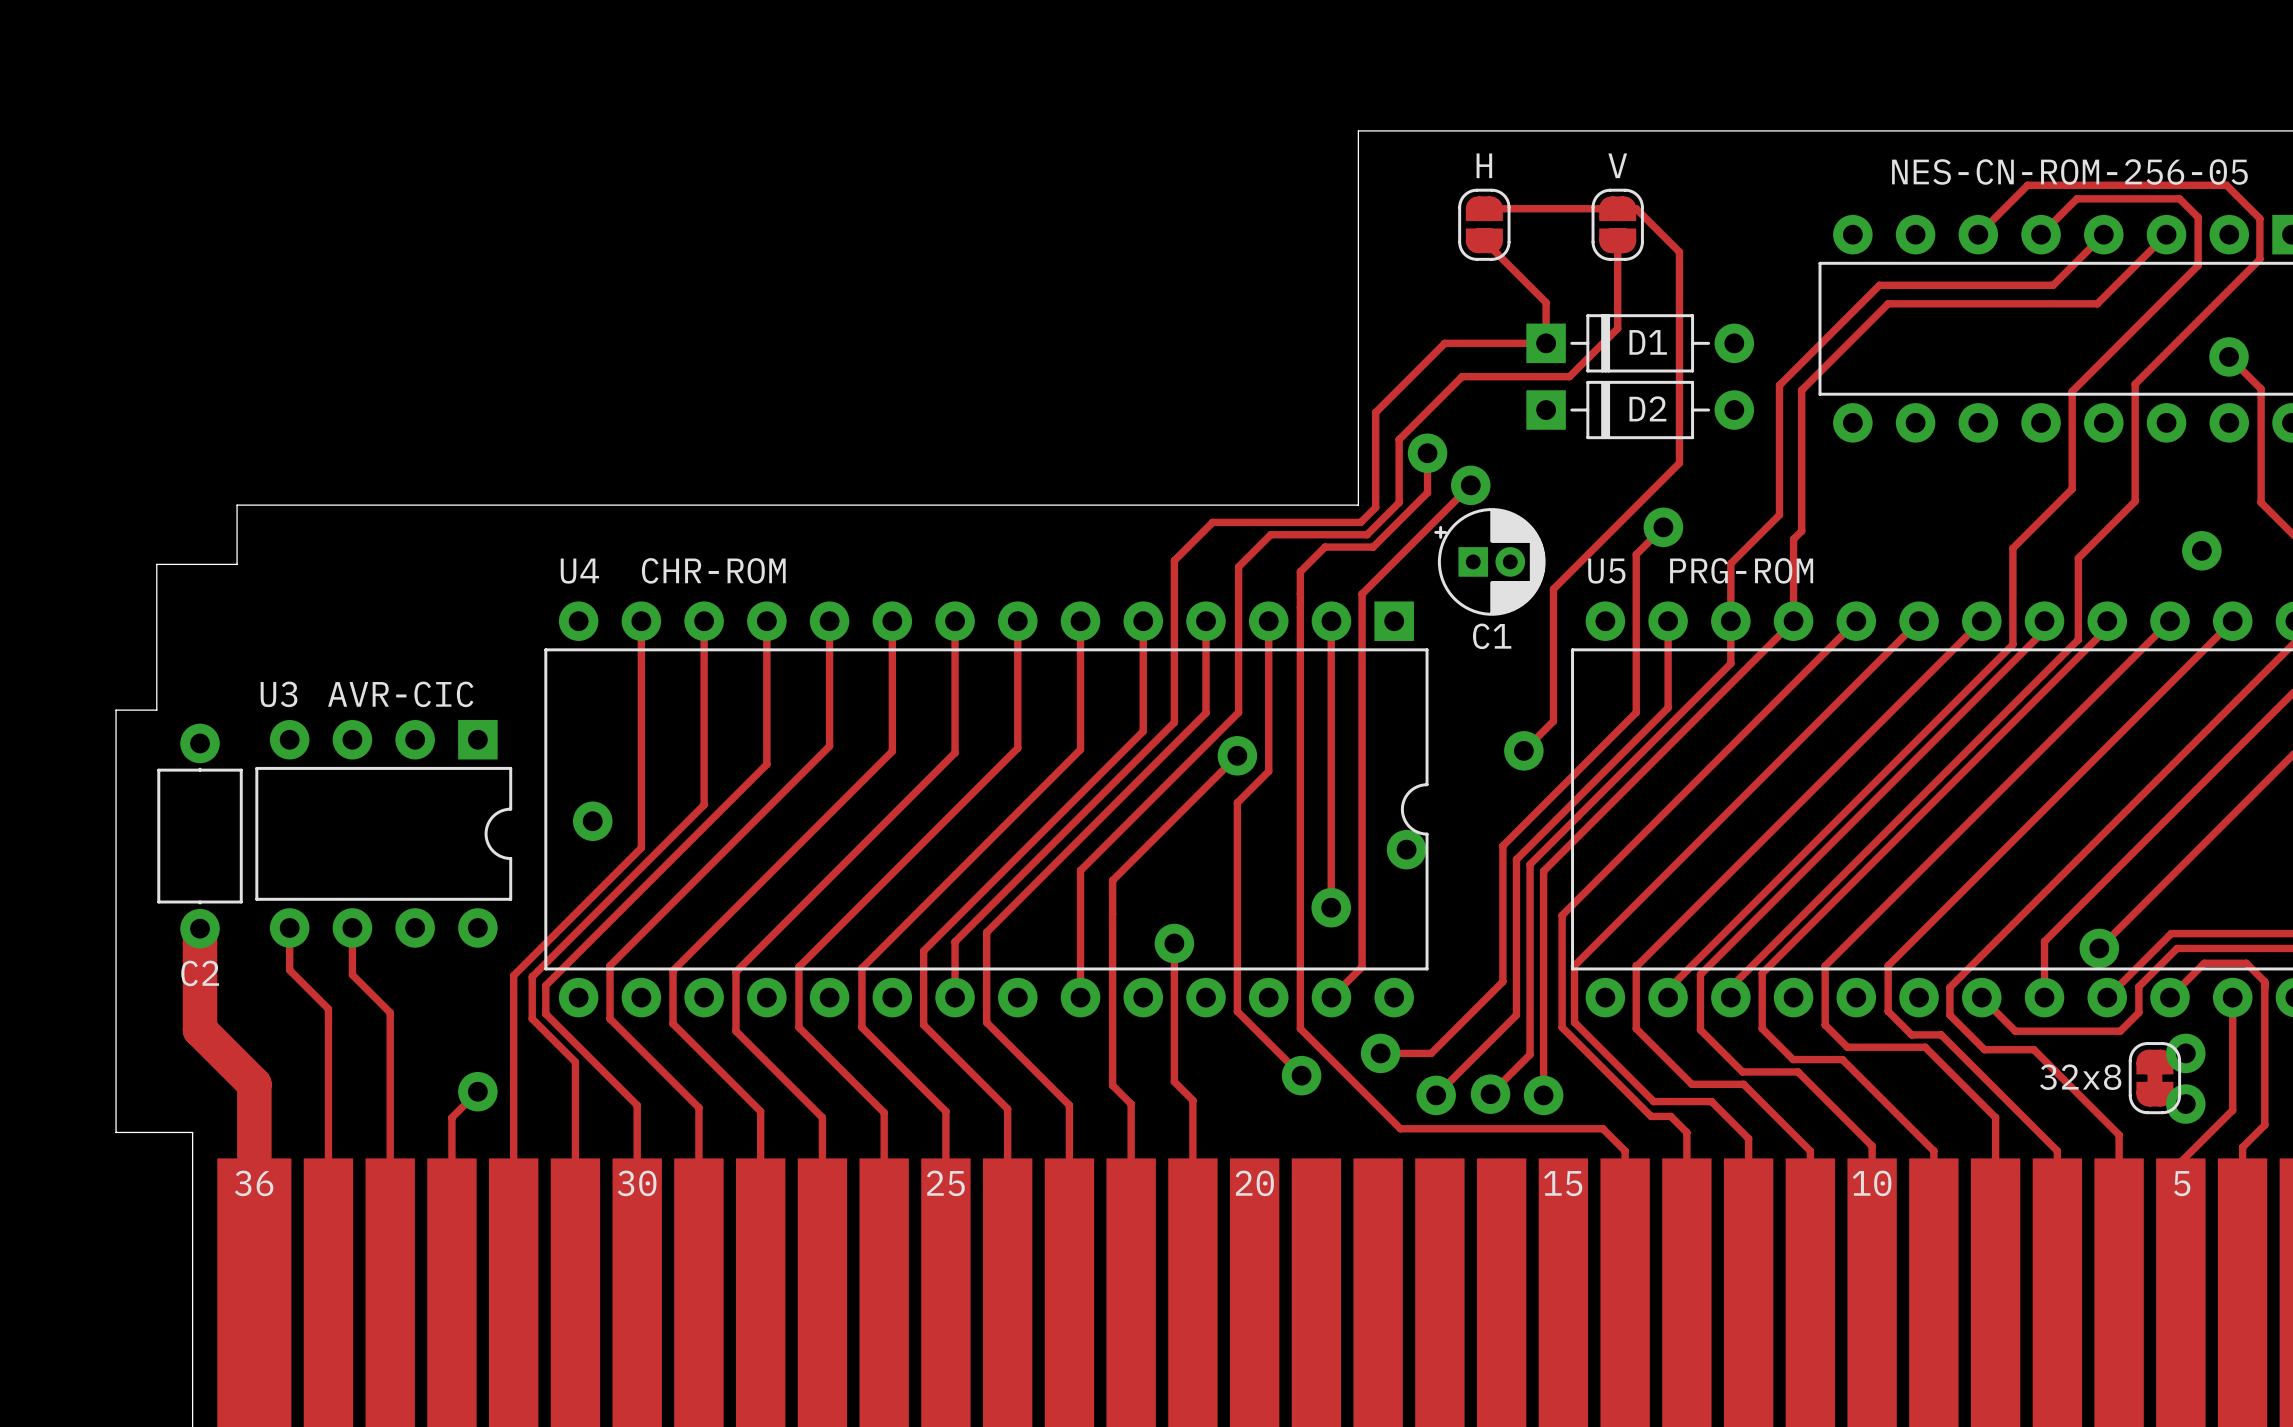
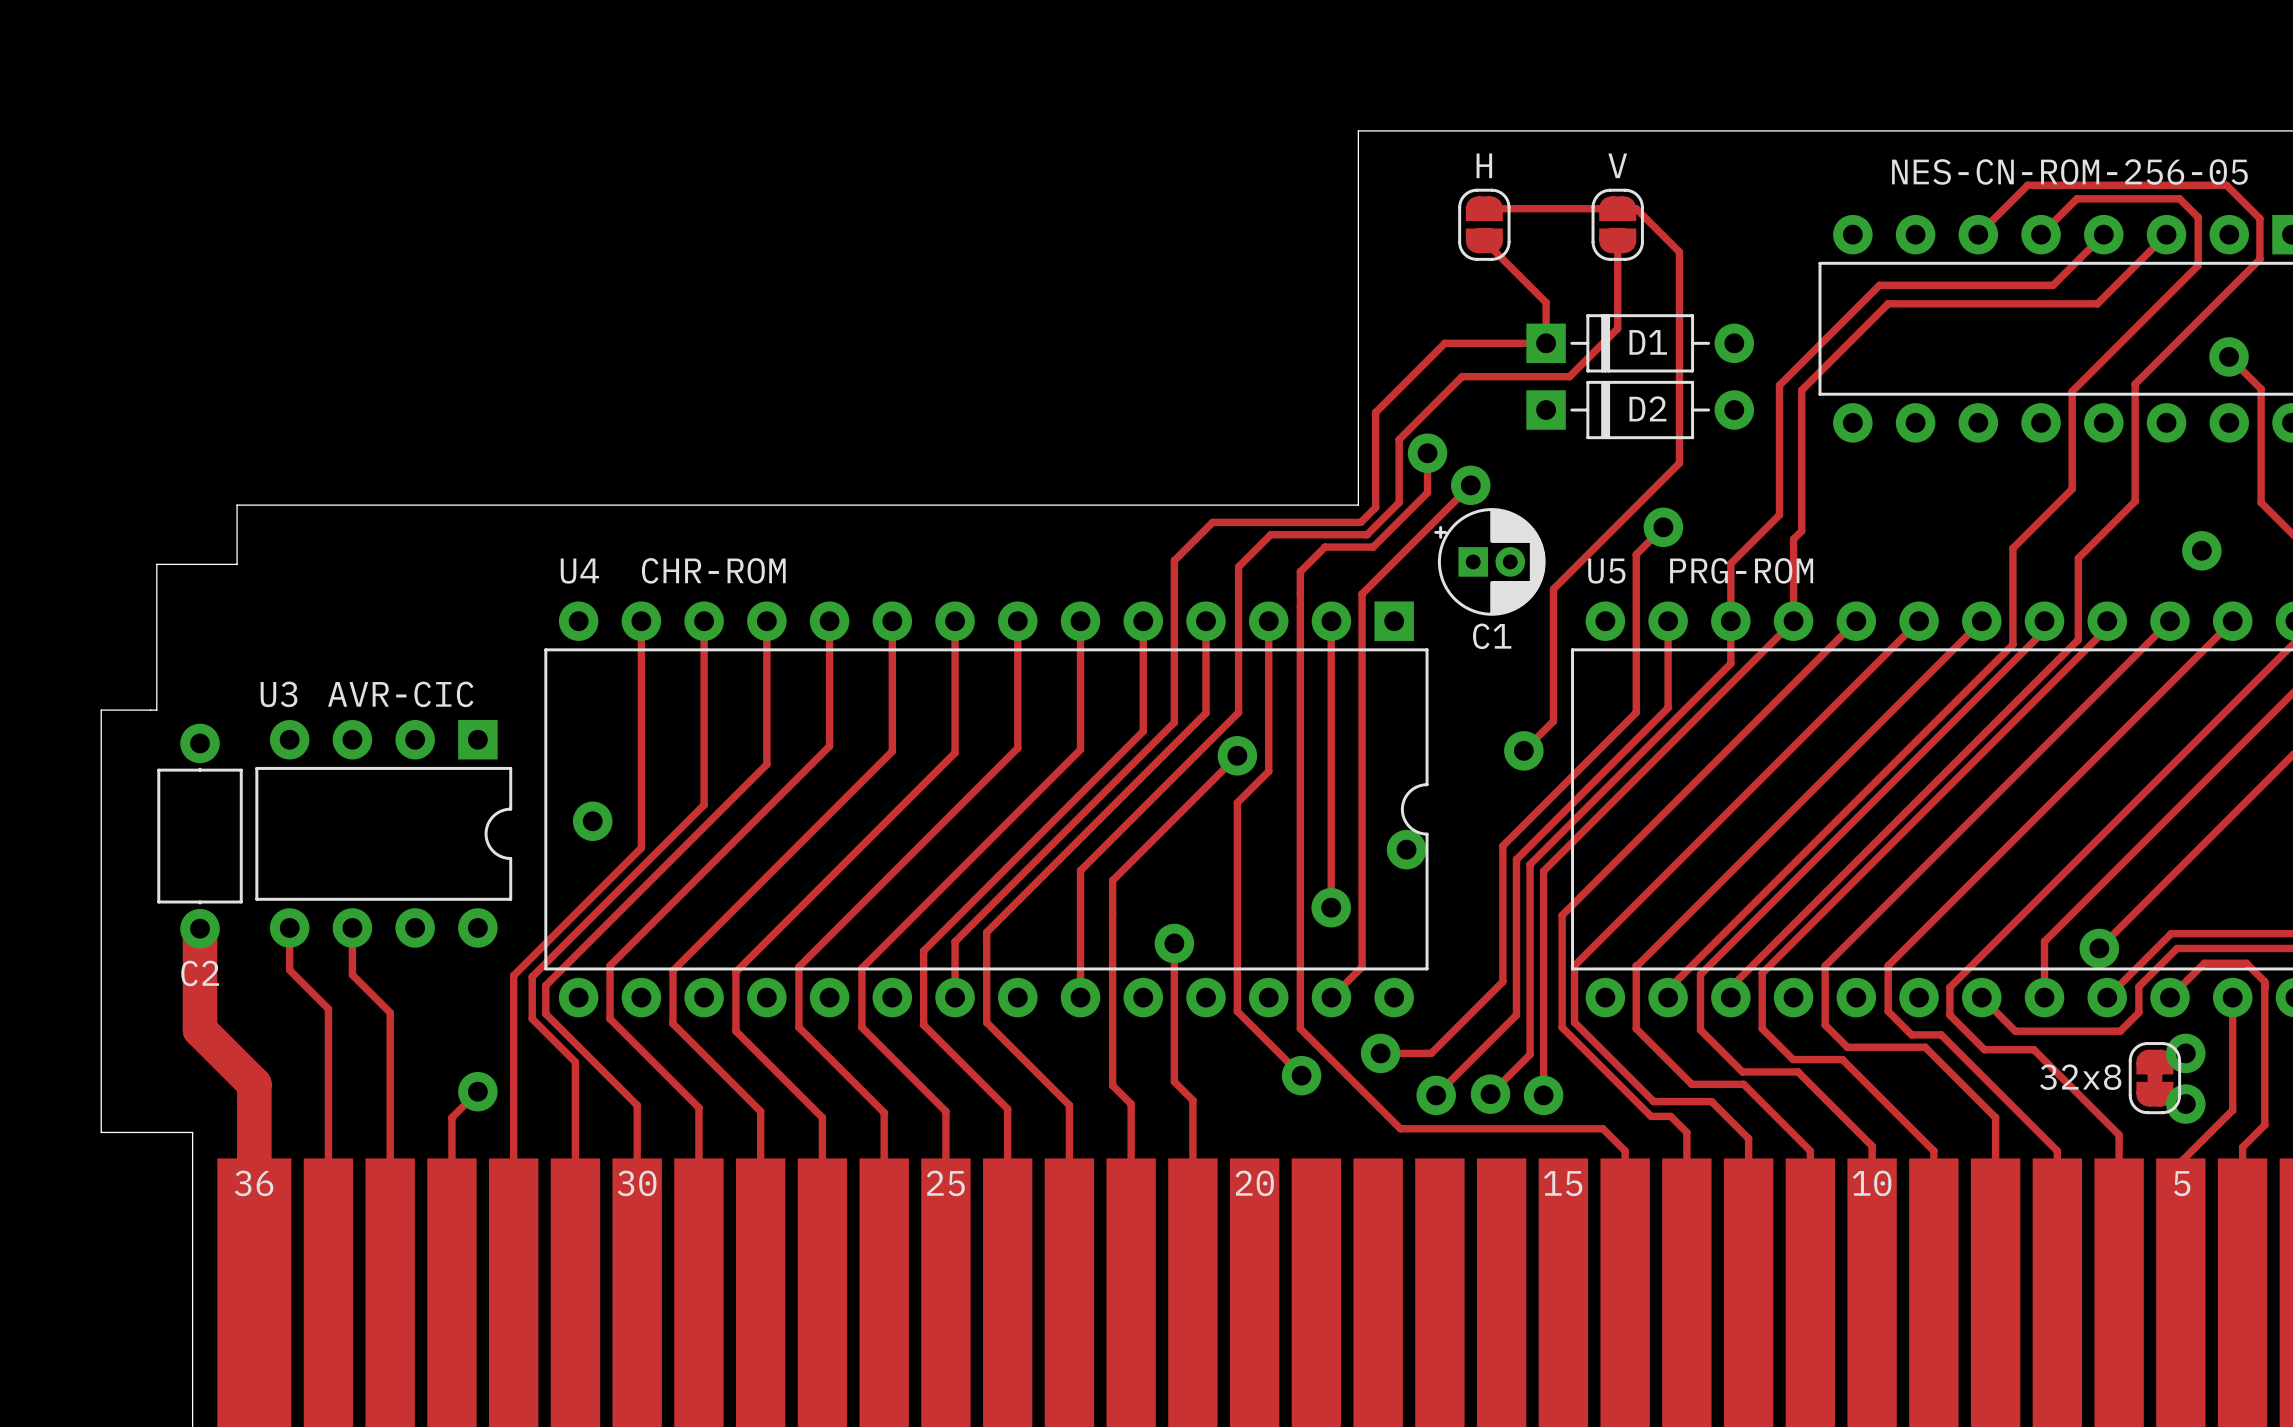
board edge: (116, 710) (116, 1132) -> (116, 710) (101, 710) (101, 1132) (116, 1132)

